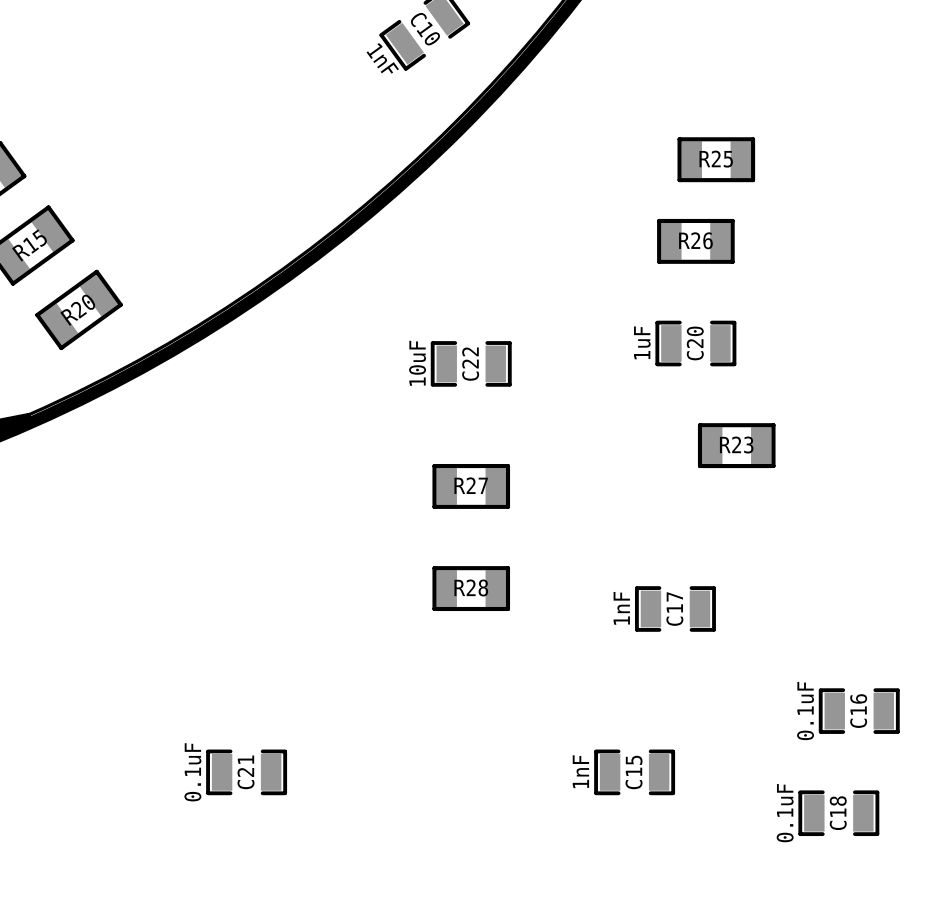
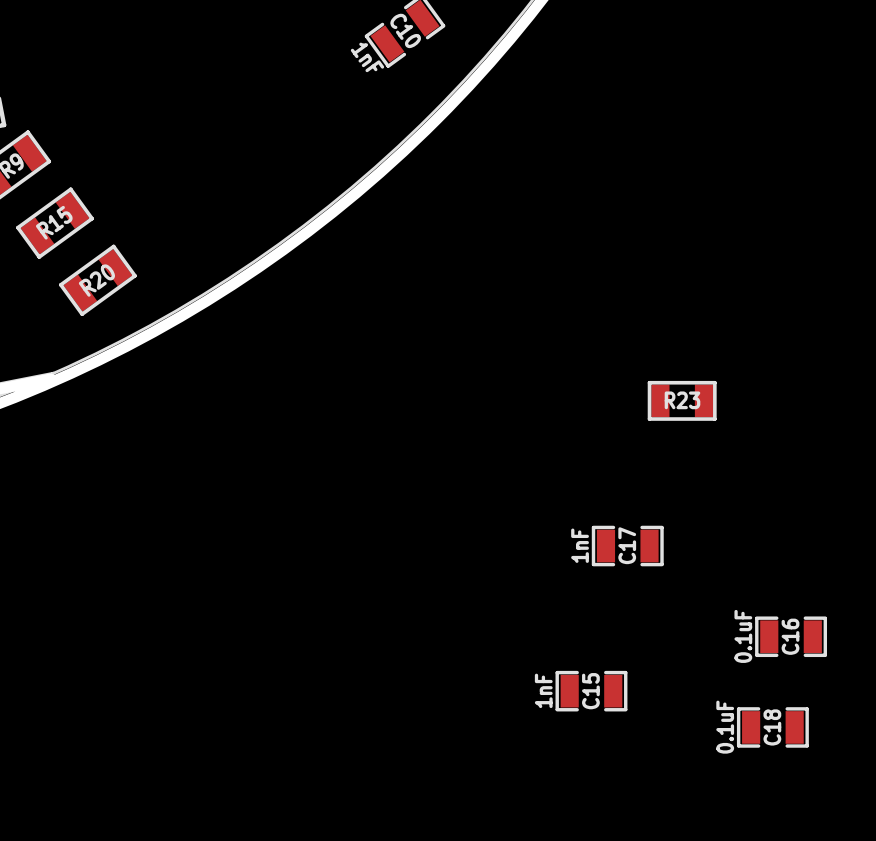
R25: (716, 159) -> none
R26: (695, 241) -> none
C20: 1uF (695, 343) -> none
C22: 10uF (471, 363) -> none
R27: (471, 486) -> none
R28: (471, 588) -> none
C21: 0.1uF (246, 772) -> none

